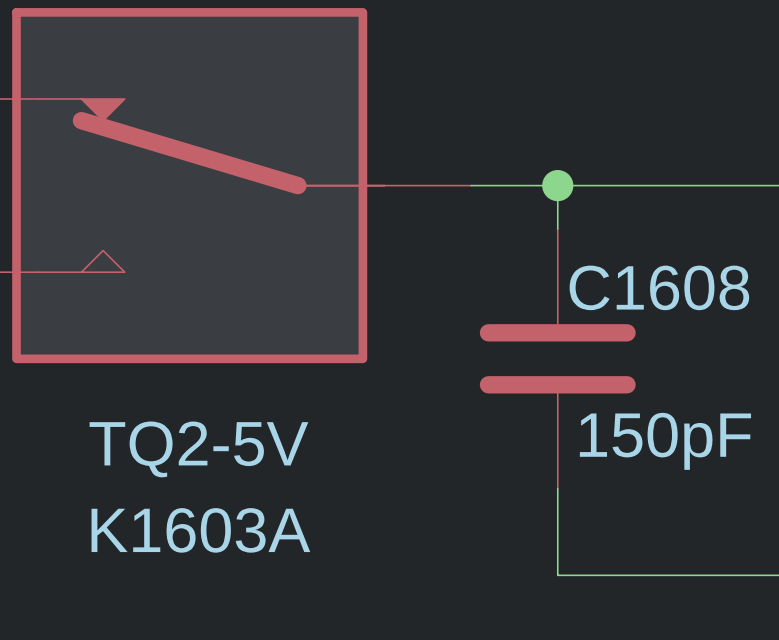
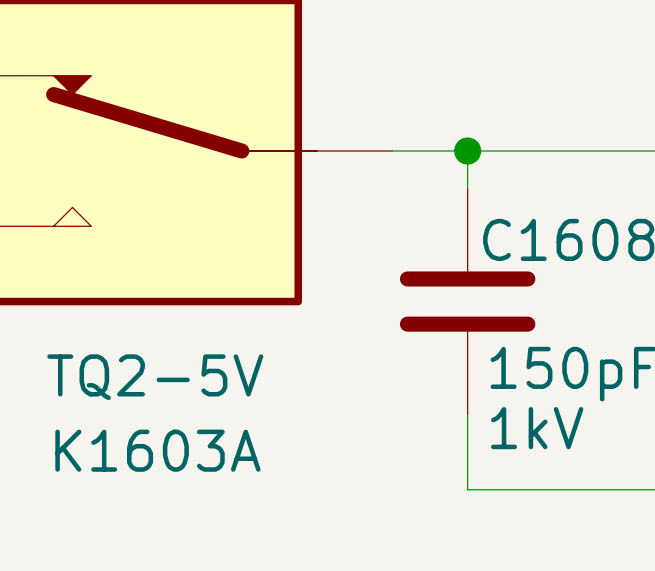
C1608 text: none -> 1kV (537, 428)

